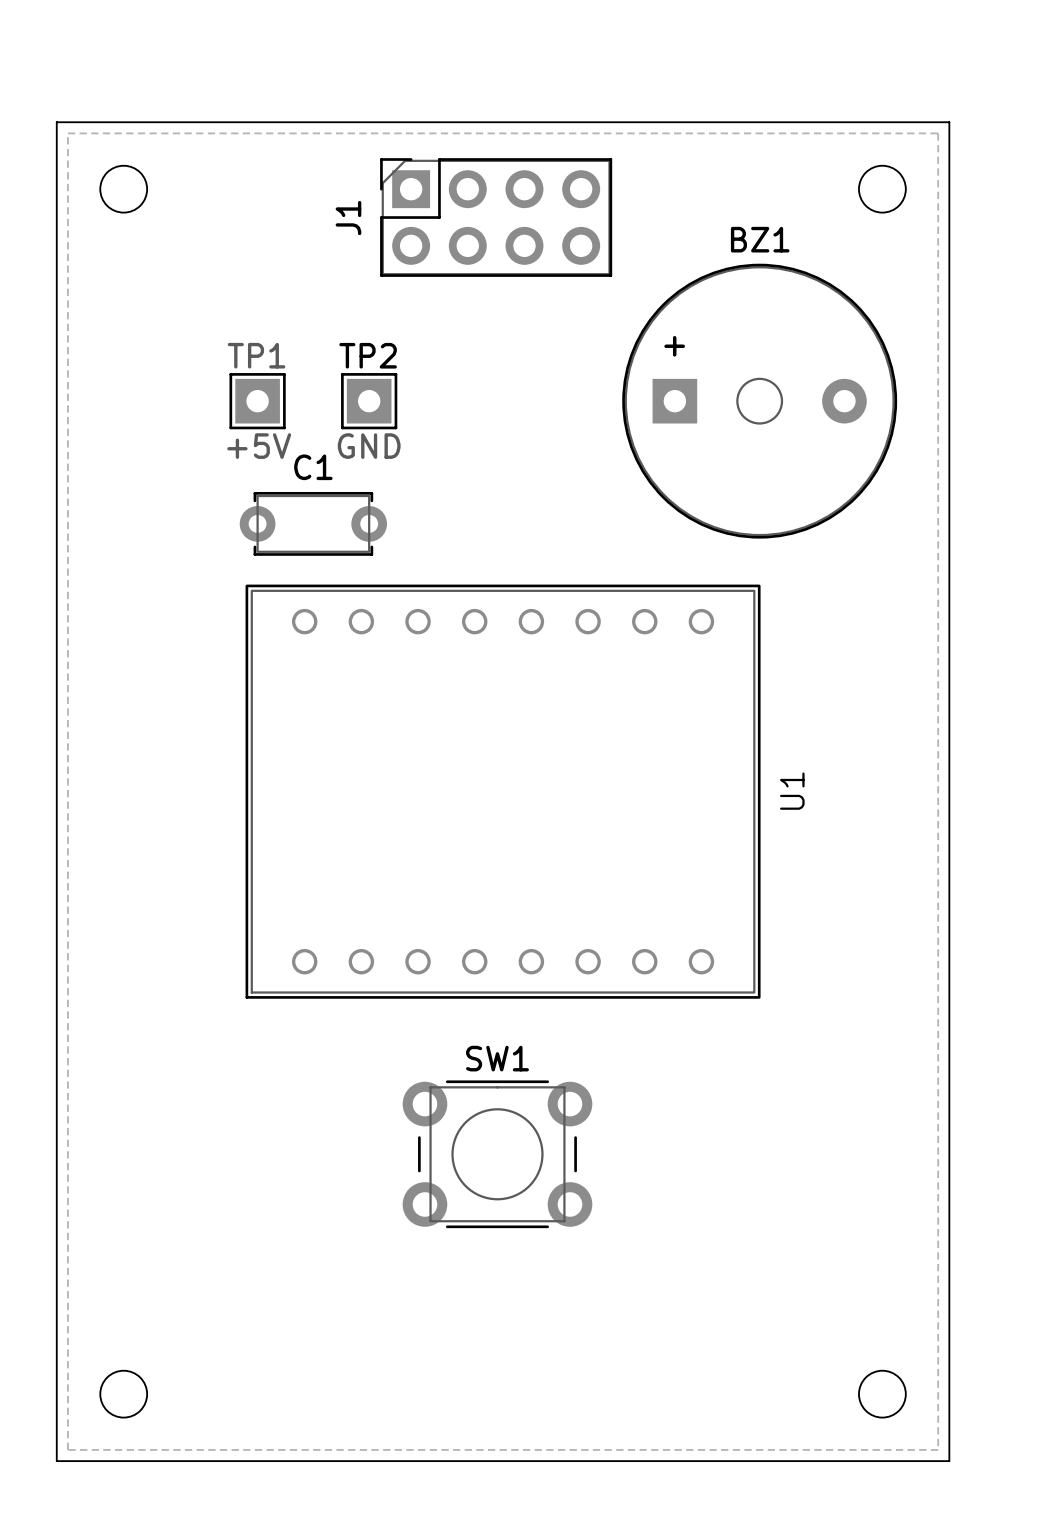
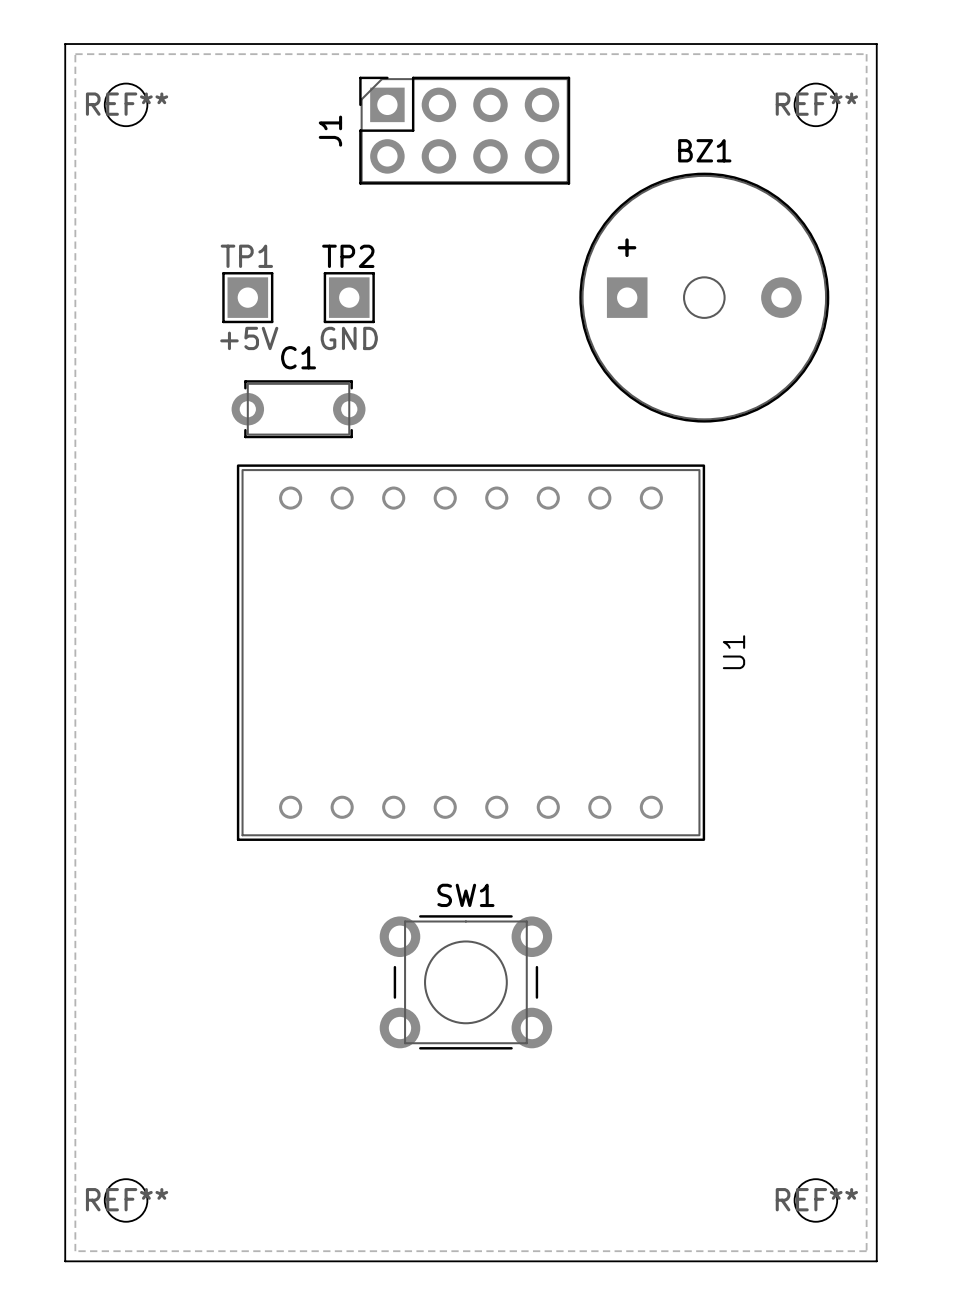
REF** name: none -> REF** (127, 104)
REF** name: none -> REF** (816, 104)
REF** name: none -> REF** (127, 1199)
REF** name: none -> REF** (816, 1199)

